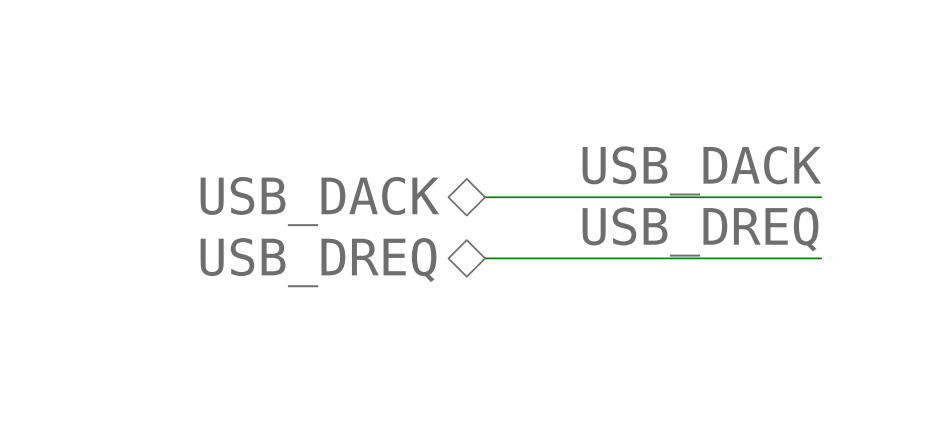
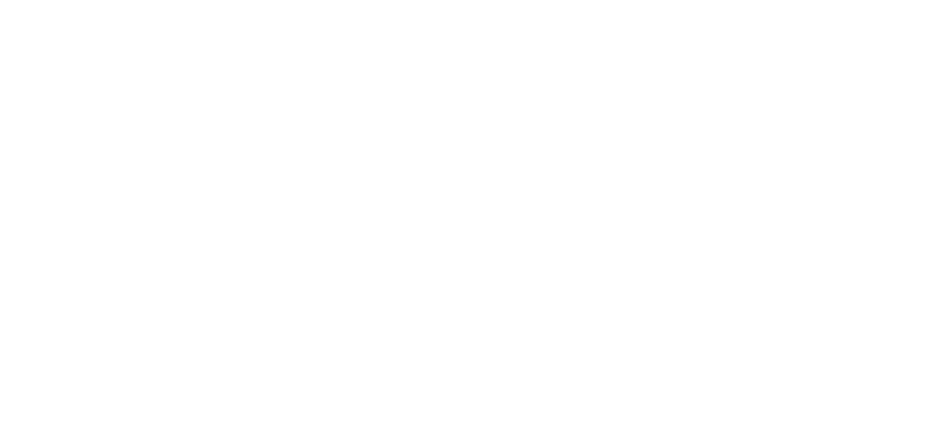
label: USB_DACK (701, 170) -> none
wire: (485, 197) (821, 197) -> none
hierarchical label: USB_DACK (319, 201) -> none
label: USB_DREQ (700, 232) -> none
wire: (485, 258) (821, 258) -> none
hierarchical label: USB_DREQ (318, 262) -> none

